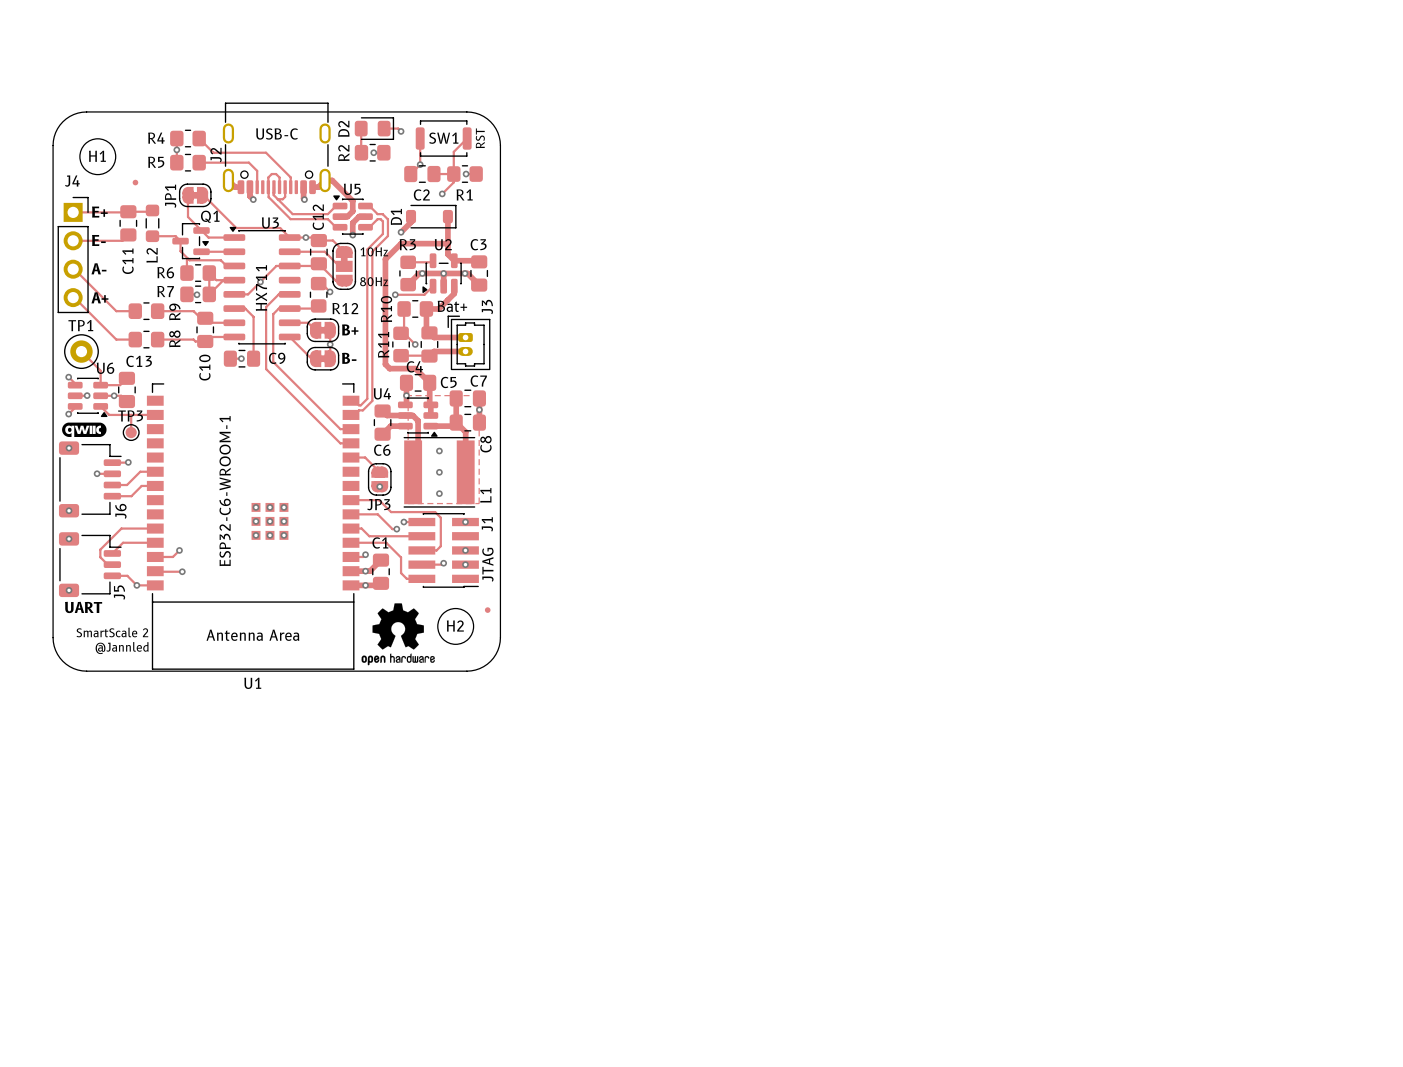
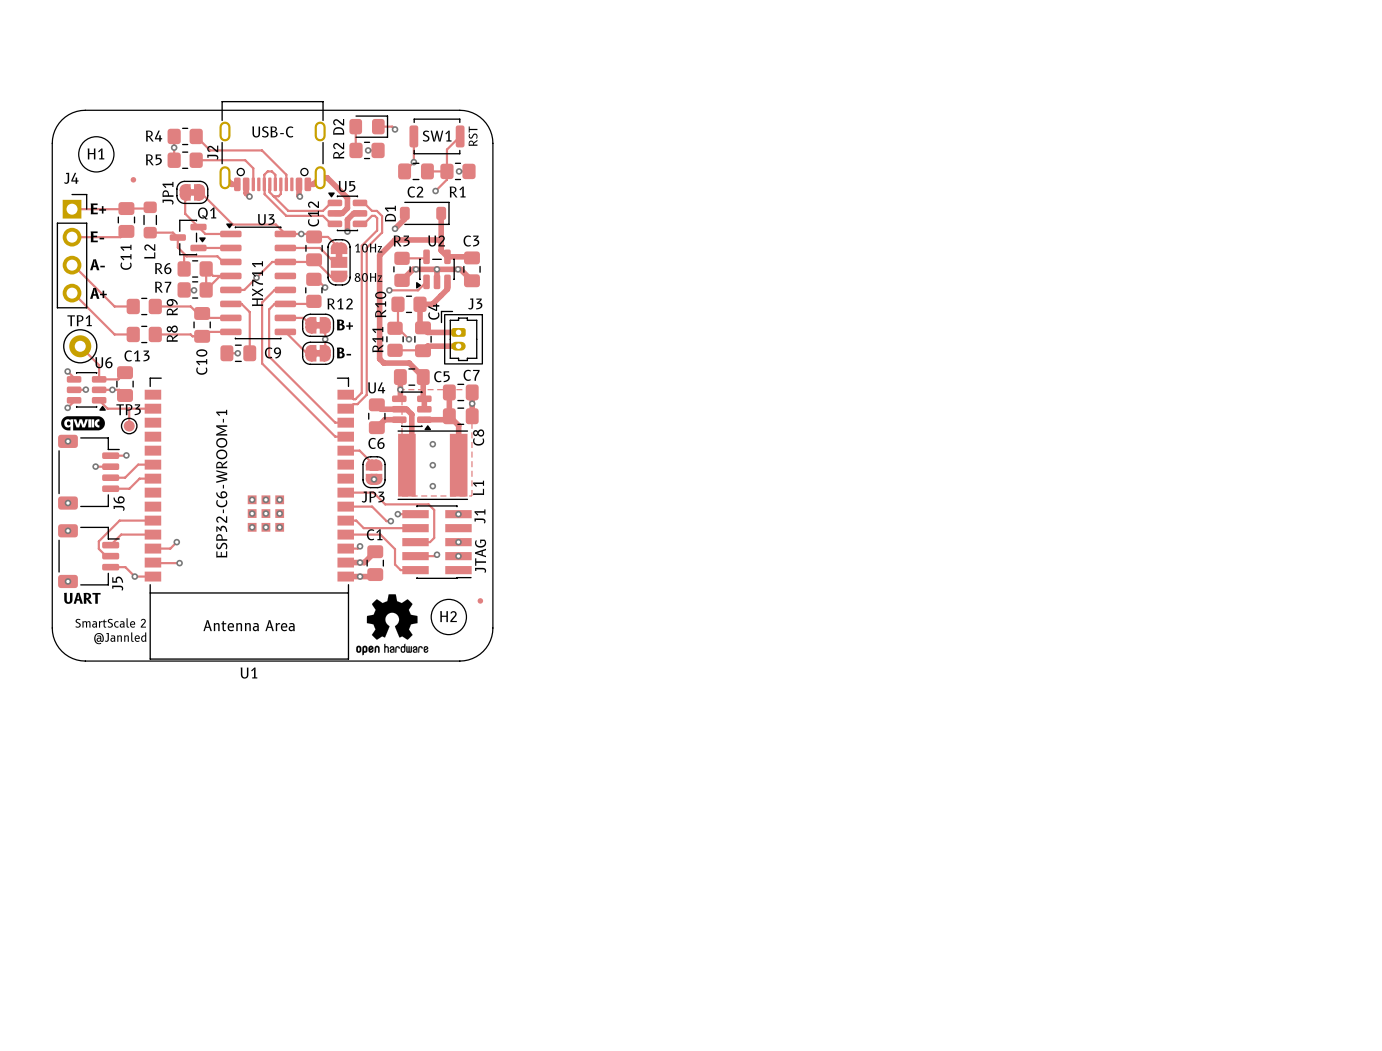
text: Bat+ (452, 306) -> none
J3 name rotation: 0° (487, 307) -> 90° clockwise (475, 303)
C4 name rotation: 0° (414, 366) -> 90° counterclockwise (433, 311)
C4 name position: C4 (414, 366) -> C4 (433, 311)

